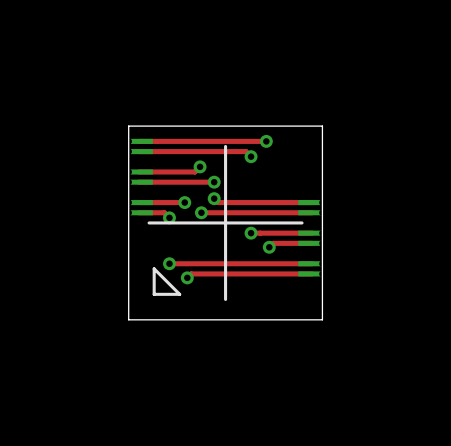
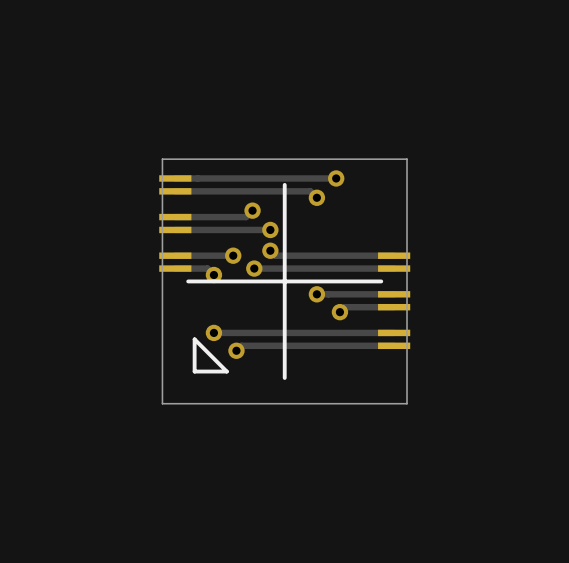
part footprint: [125, 138, 153, 145] -> [159, 175, 192, 182]
part footprint: [125, 148, 153, 155] -> [159, 188, 192, 195]
part footprint: [125, 168, 153, 176] -> [159, 213, 192, 221]
part footprint: [125, 178, 153, 186] -> [159, 226, 192, 234]
part footprint: [125, 199, 153, 206] -> [159, 252, 192, 259]
part footprint: [298, 199, 326, 206] -> [378, 252, 411, 259]
part footprint: [125, 209, 153, 217] -> [159, 265, 192, 272]
part footprint: [298, 209, 326, 217] -> [378, 265, 411, 272]
part footprint: [298, 229, 326, 237] -> [378, 291, 411, 298]
part footprint: [298, 240, 326, 247] -> [378, 303, 411, 311]
part footprint: [298, 260, 326, 267] -> [378, 329, 411, 337]
part footprint: [298, 270, 326, 278] -> [378, 342, 411, 350]

